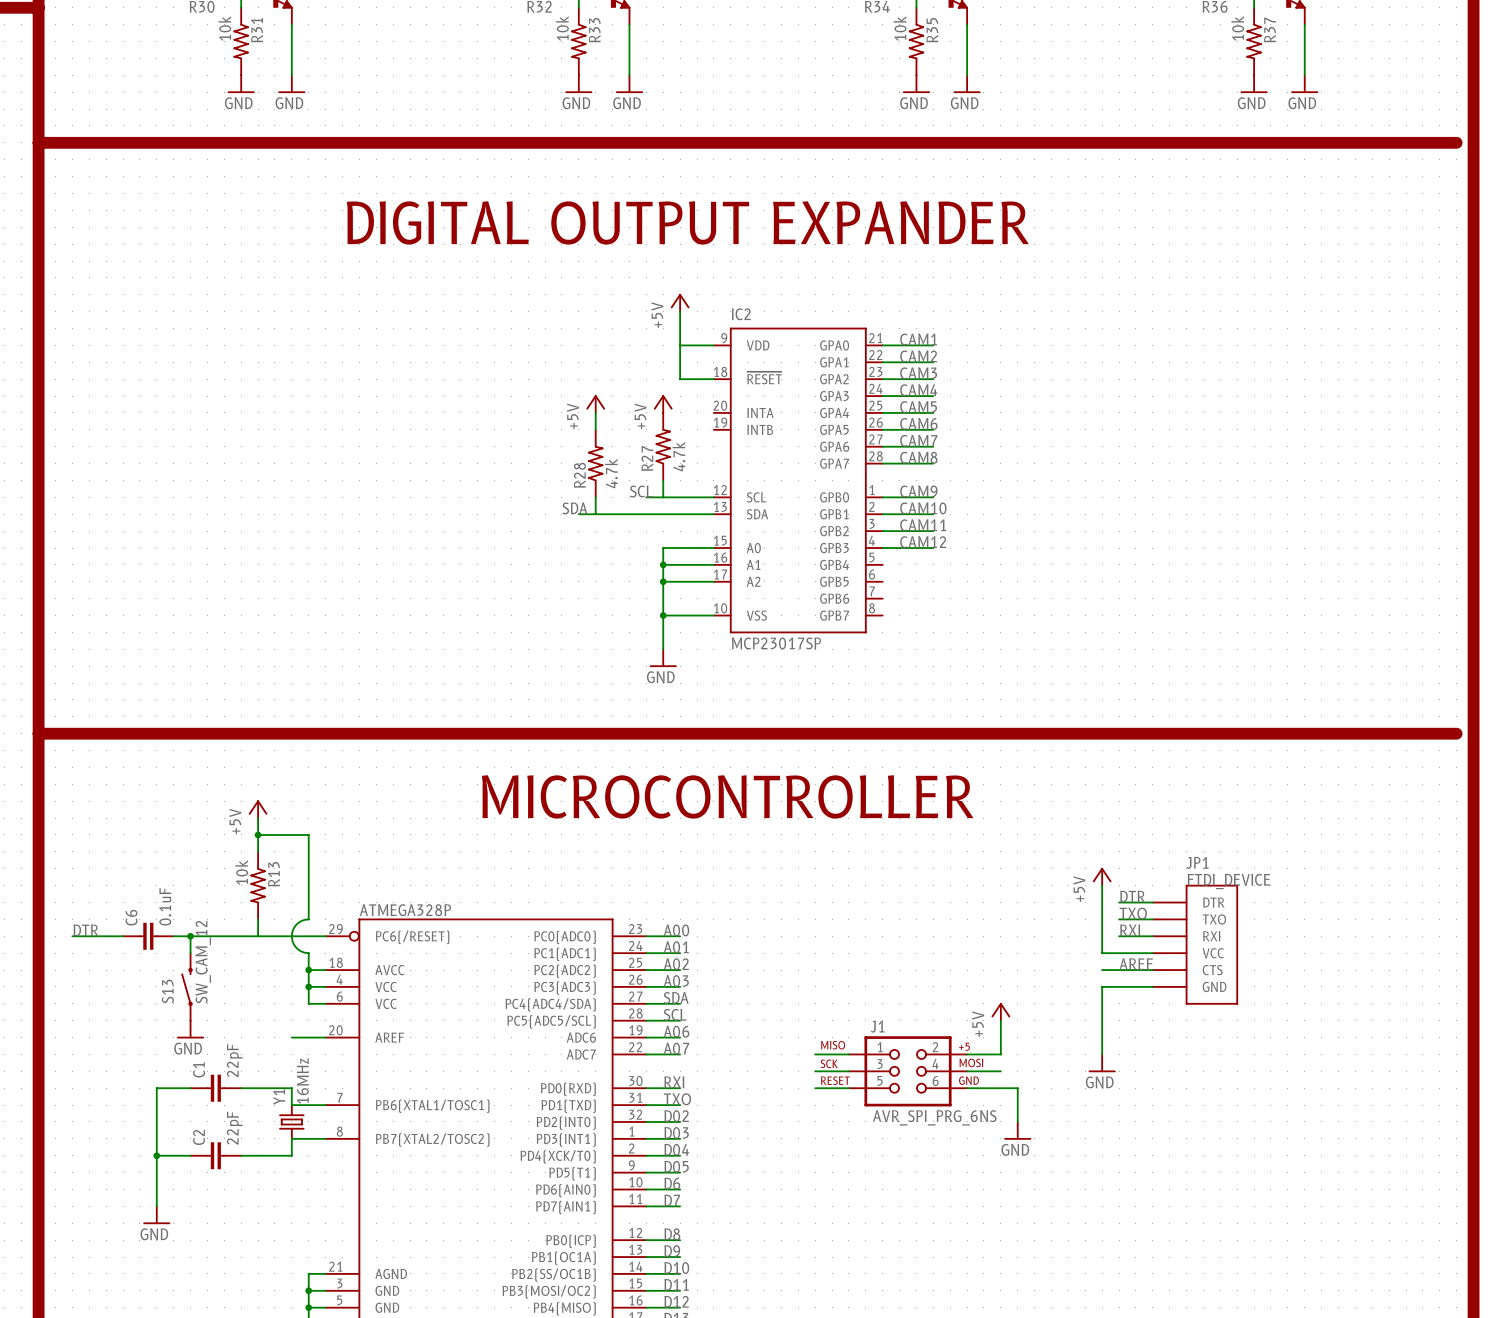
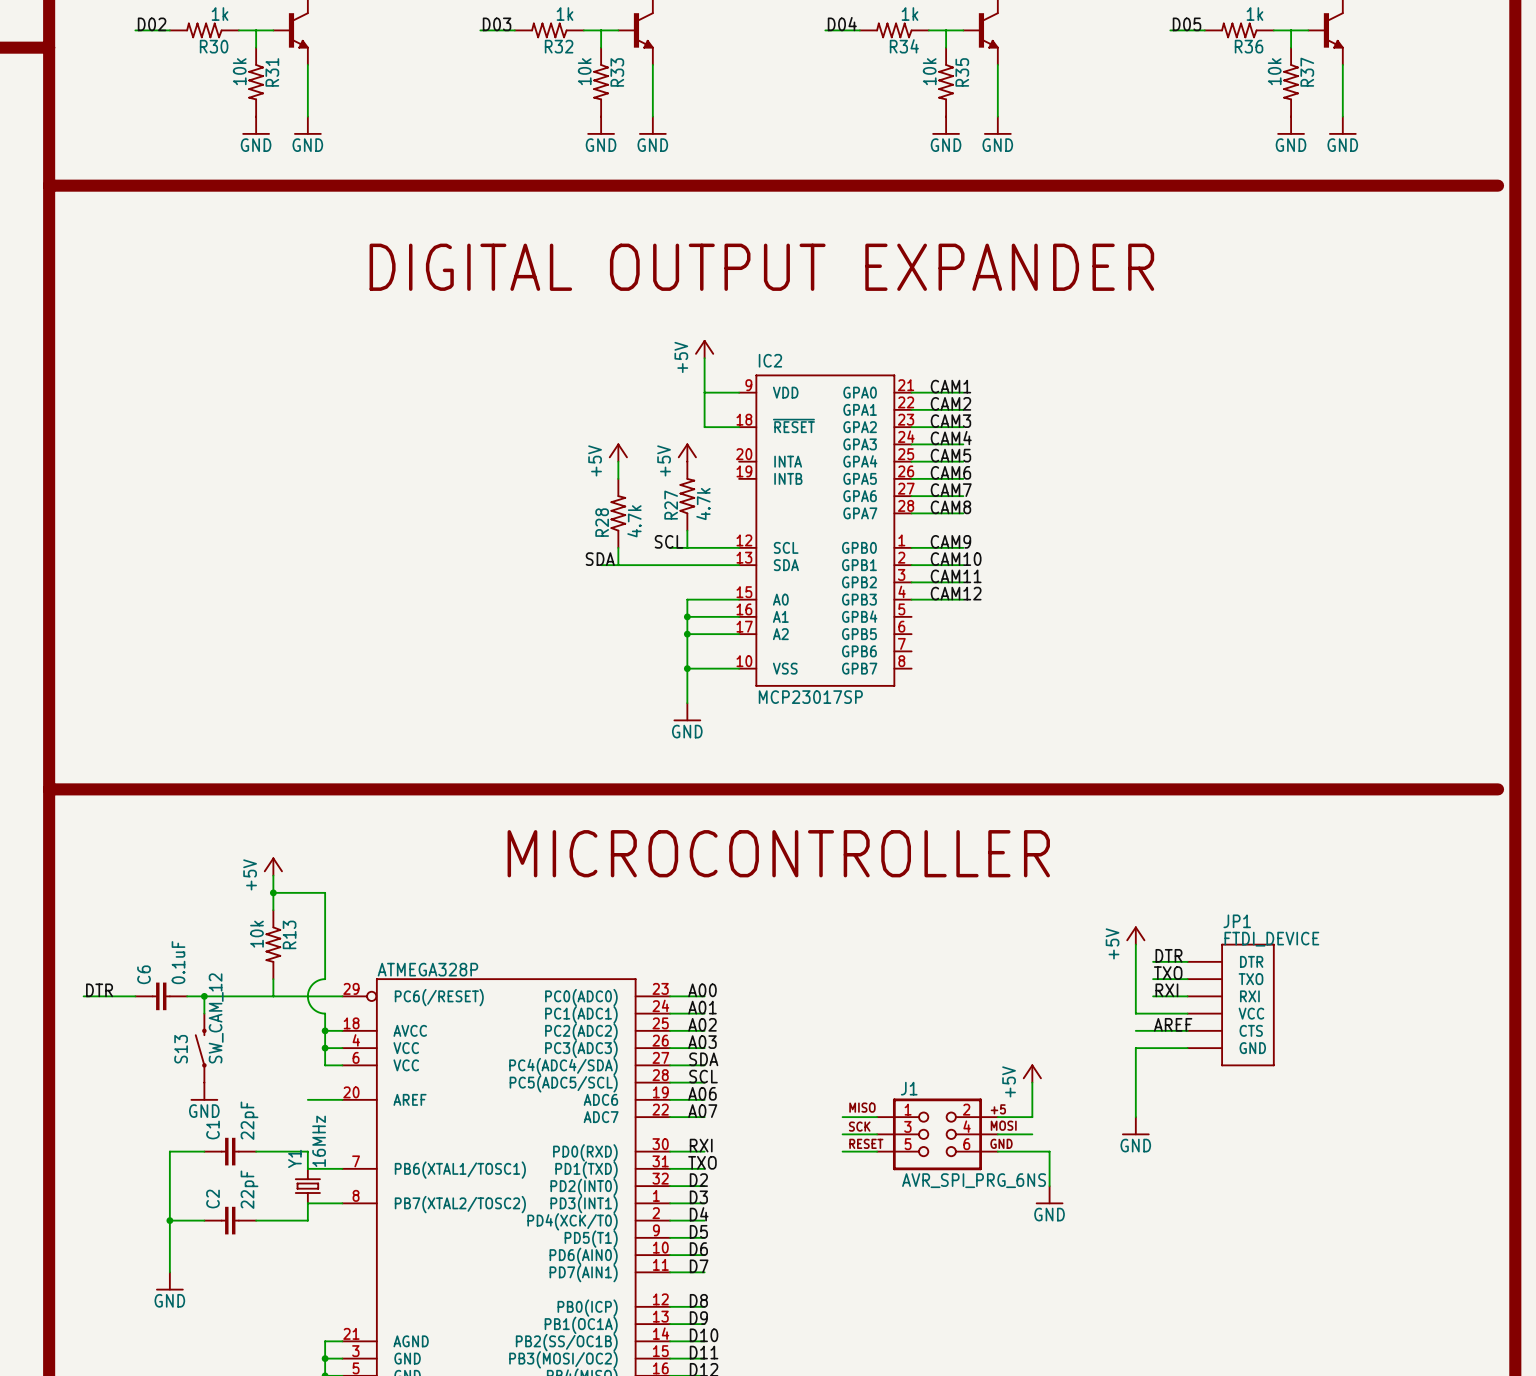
label: D02 (676, 1116) -> D2 (698, 1180)
label: D03 (676, 1133) -> D3 (698, 1197)
label: D04 (676, 1149) -> D4 (699, 1214)
label: D05 (676, 1166) -> D5 (698, 1231)

